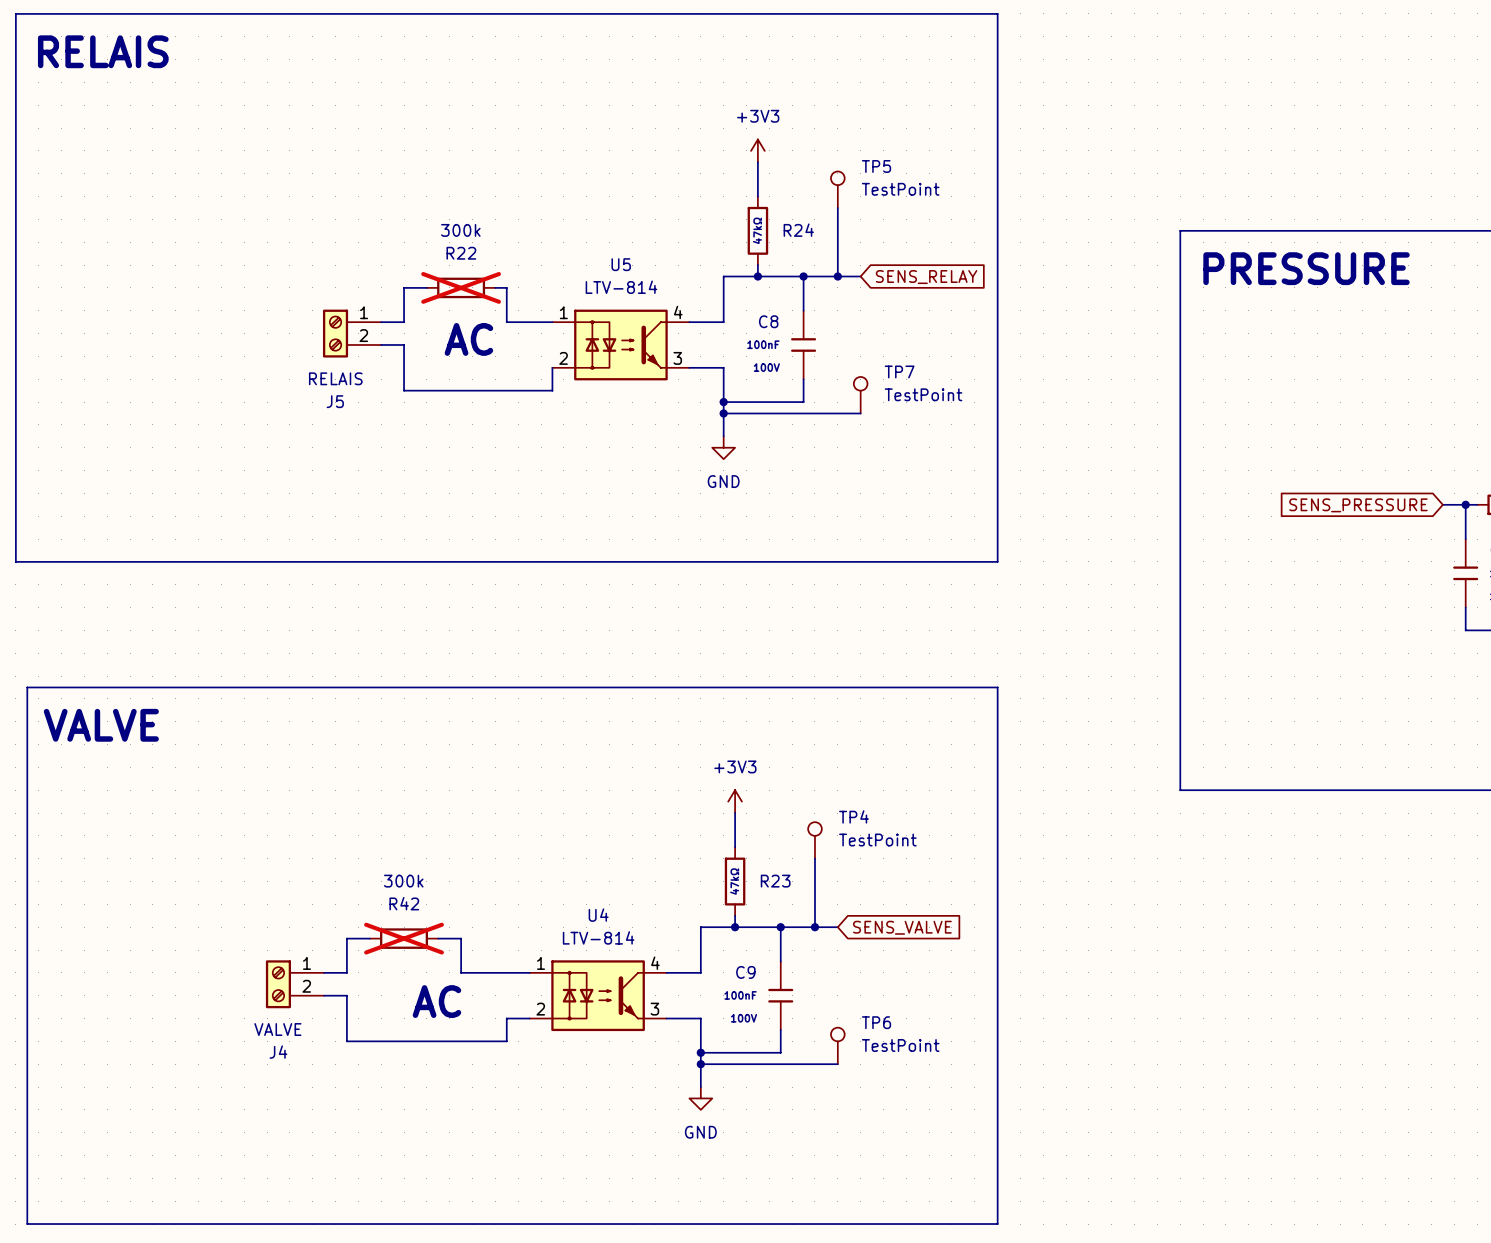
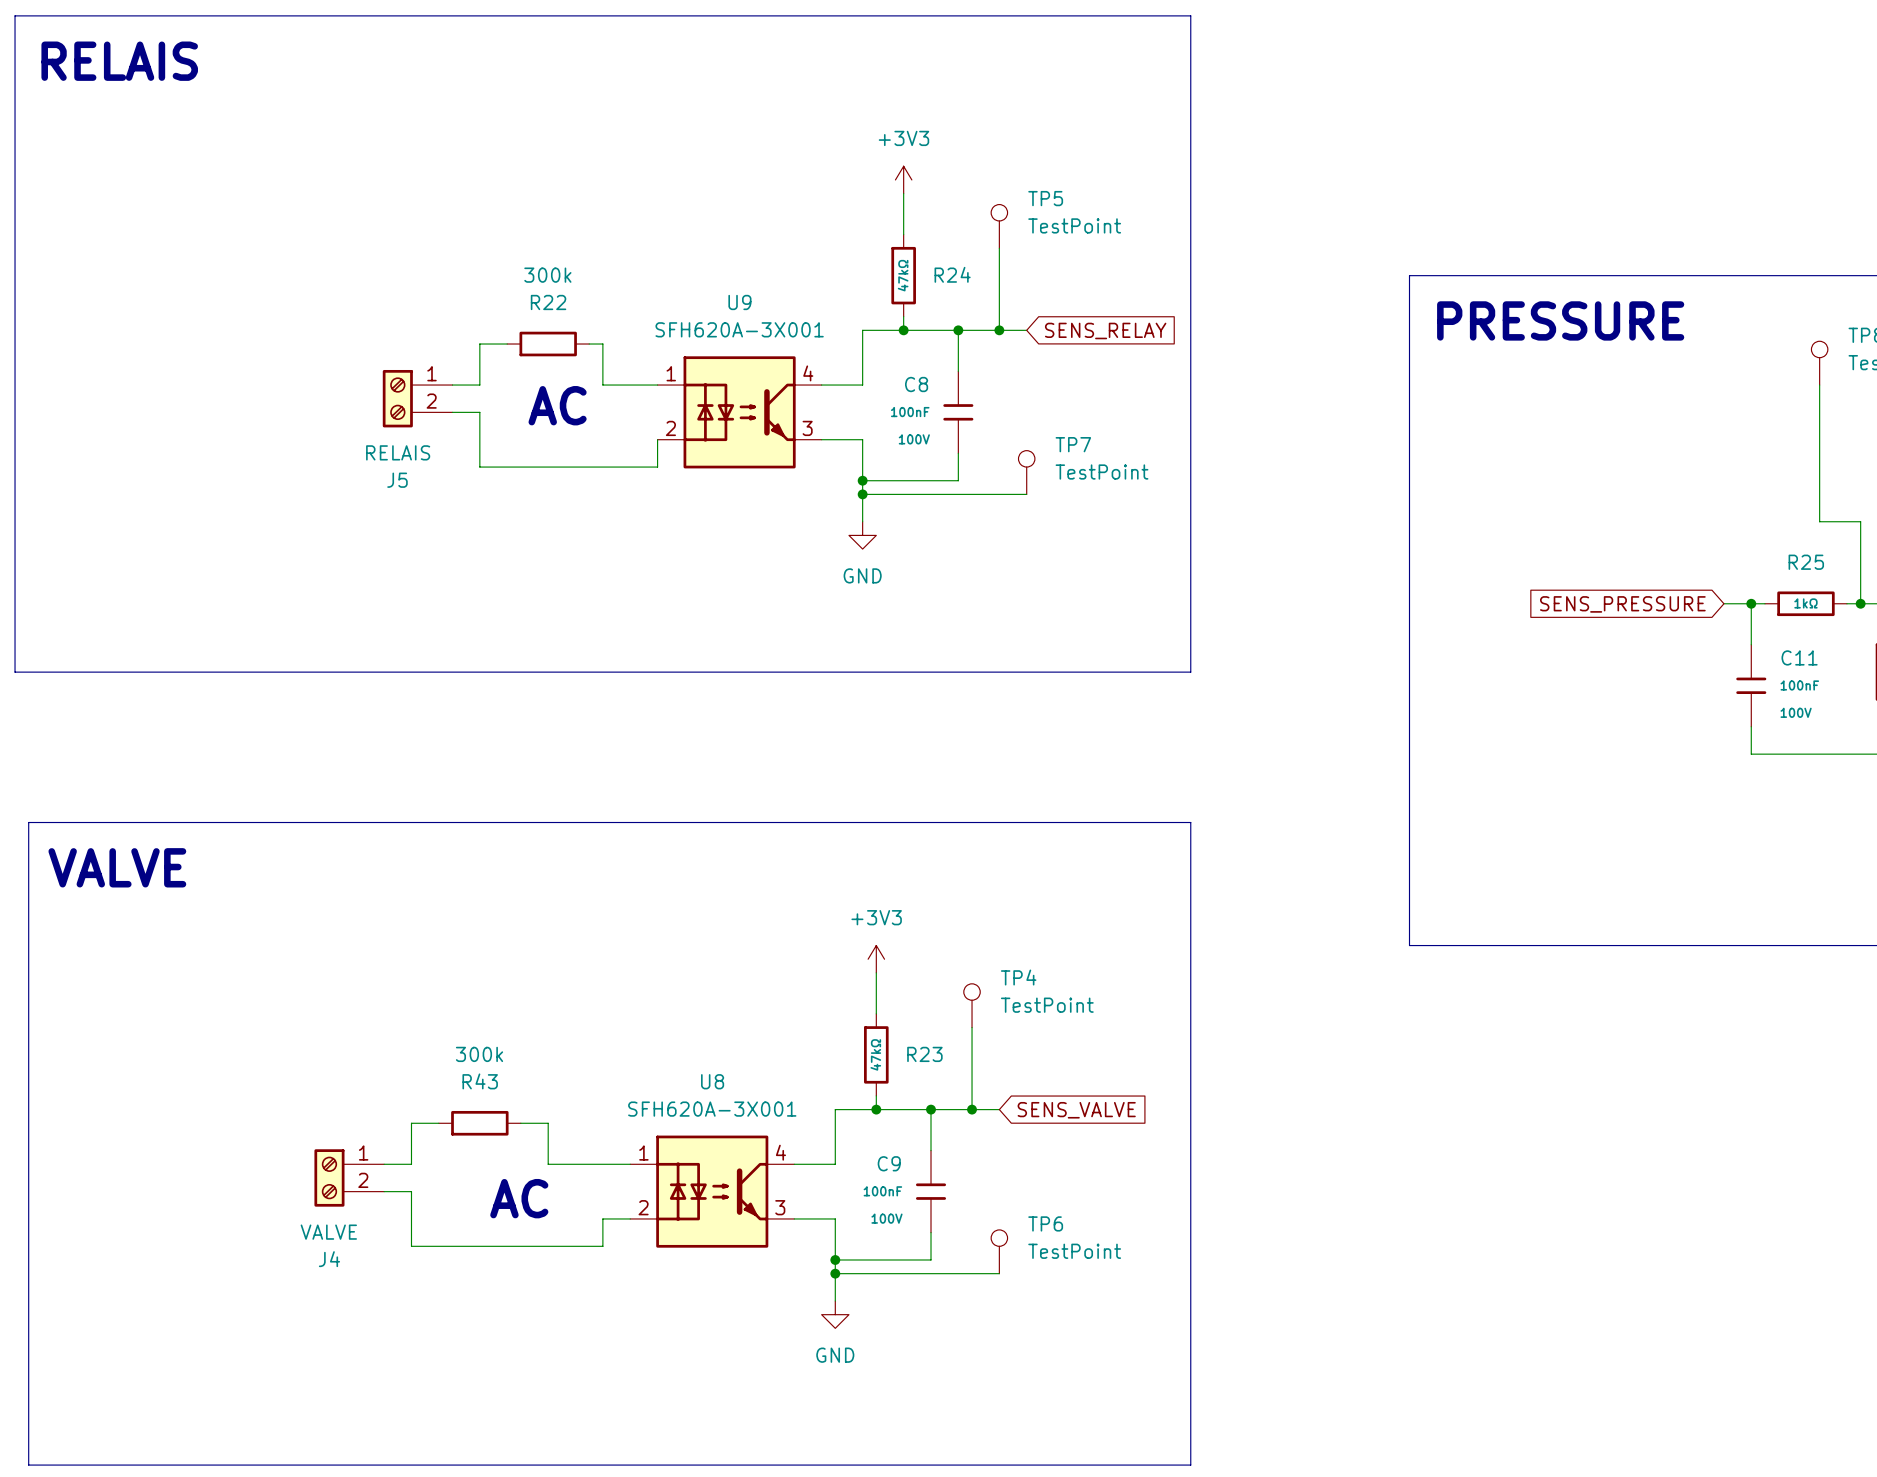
R22 do-not-place cross: (461, 287) -> none
U5: LTV-814 (620, 344) -> none
U9: none -> SFH620A-3X001 (739, 412)
R42 name: R42 (404, 903) -> R43 (480, 1081)
R42 do-not-place cross: (404, 938) -> none
U4: LTV-814 (598, 995) -> none
U8: none -> SFH620A-3X001 (712, 1191)

